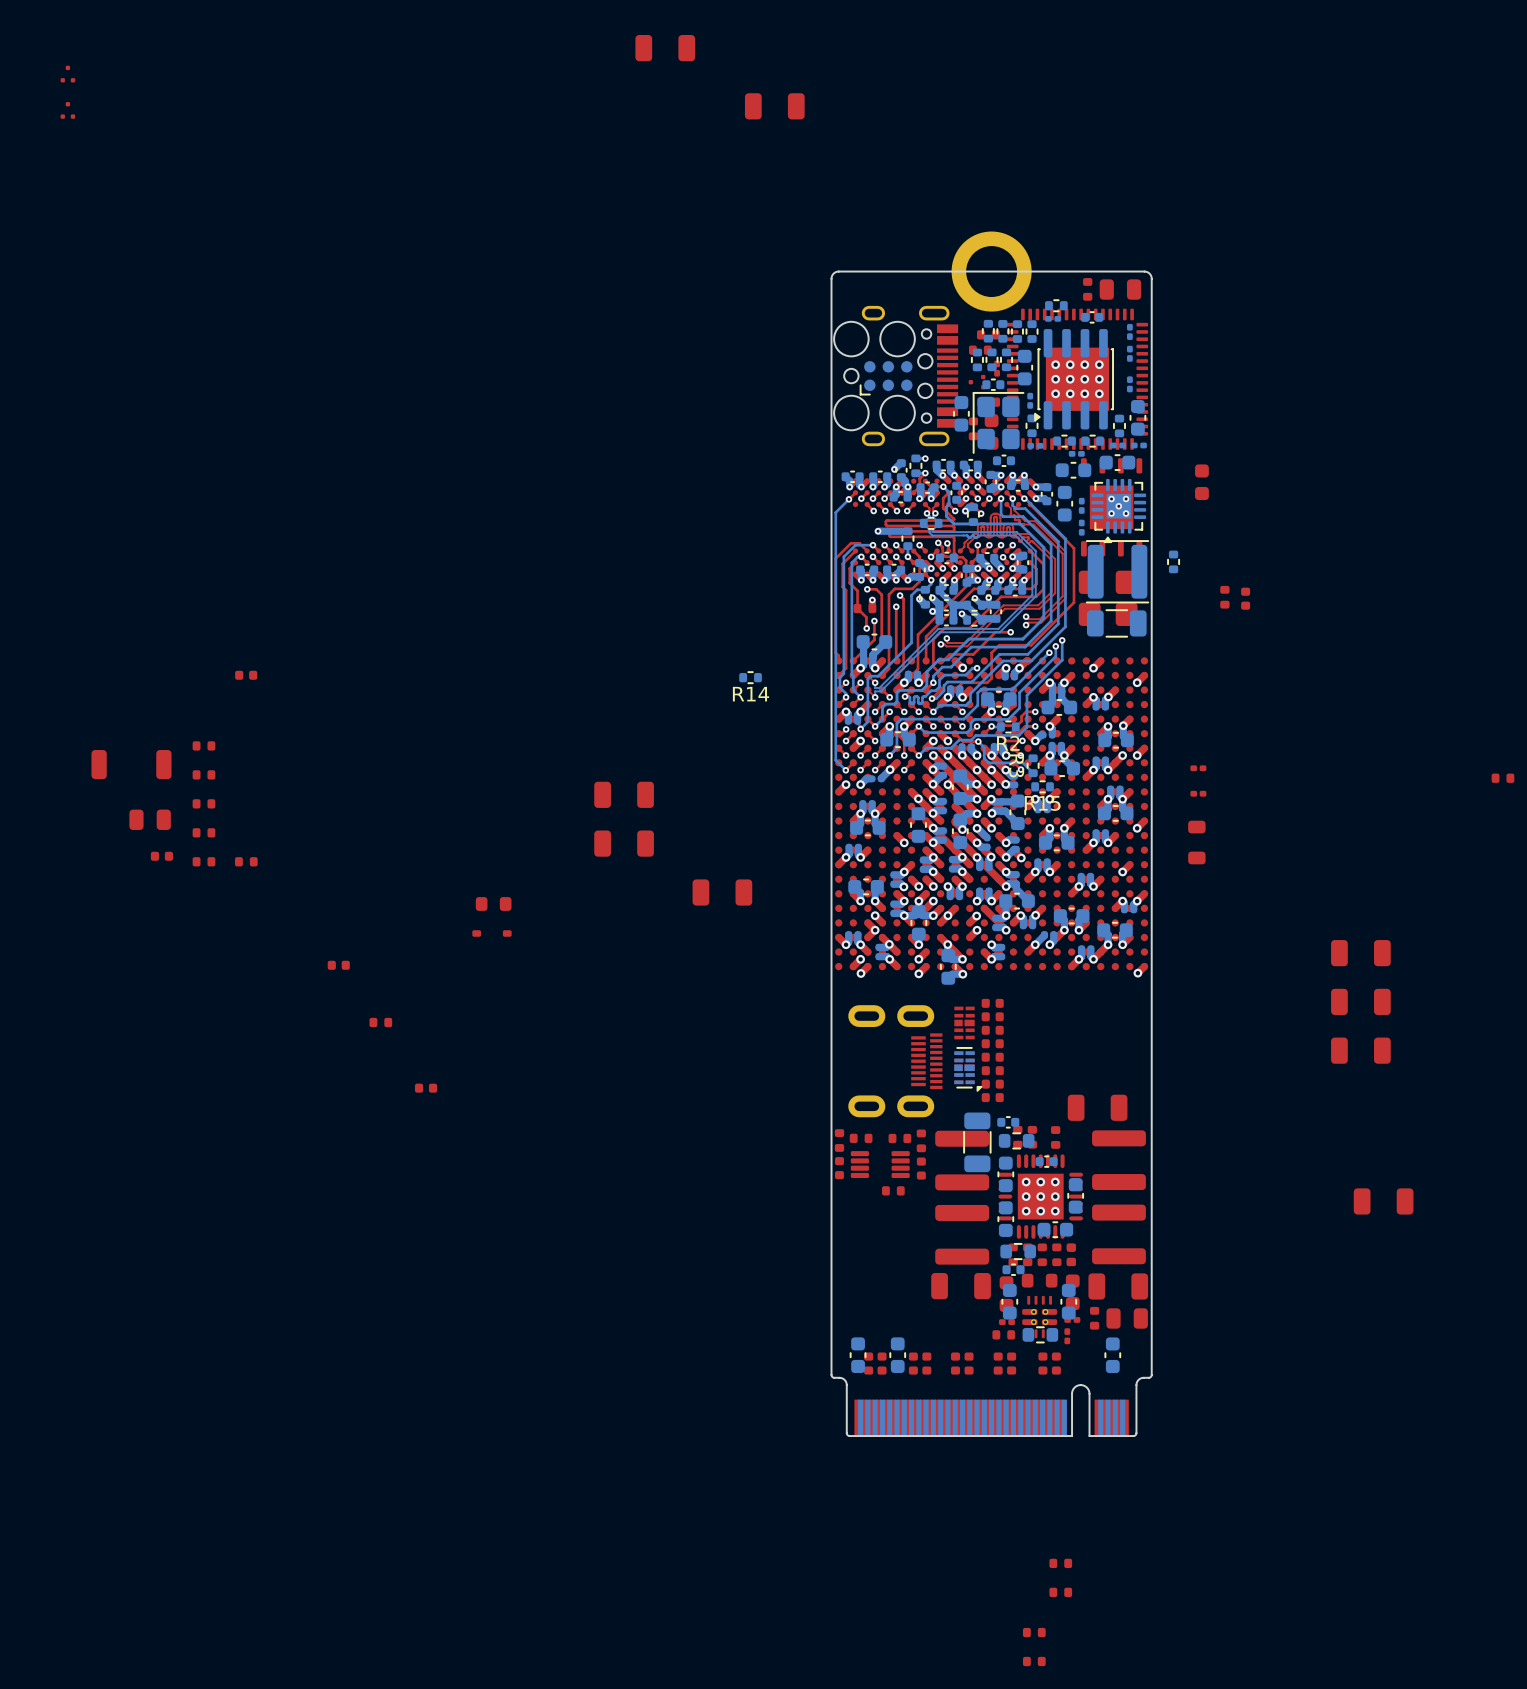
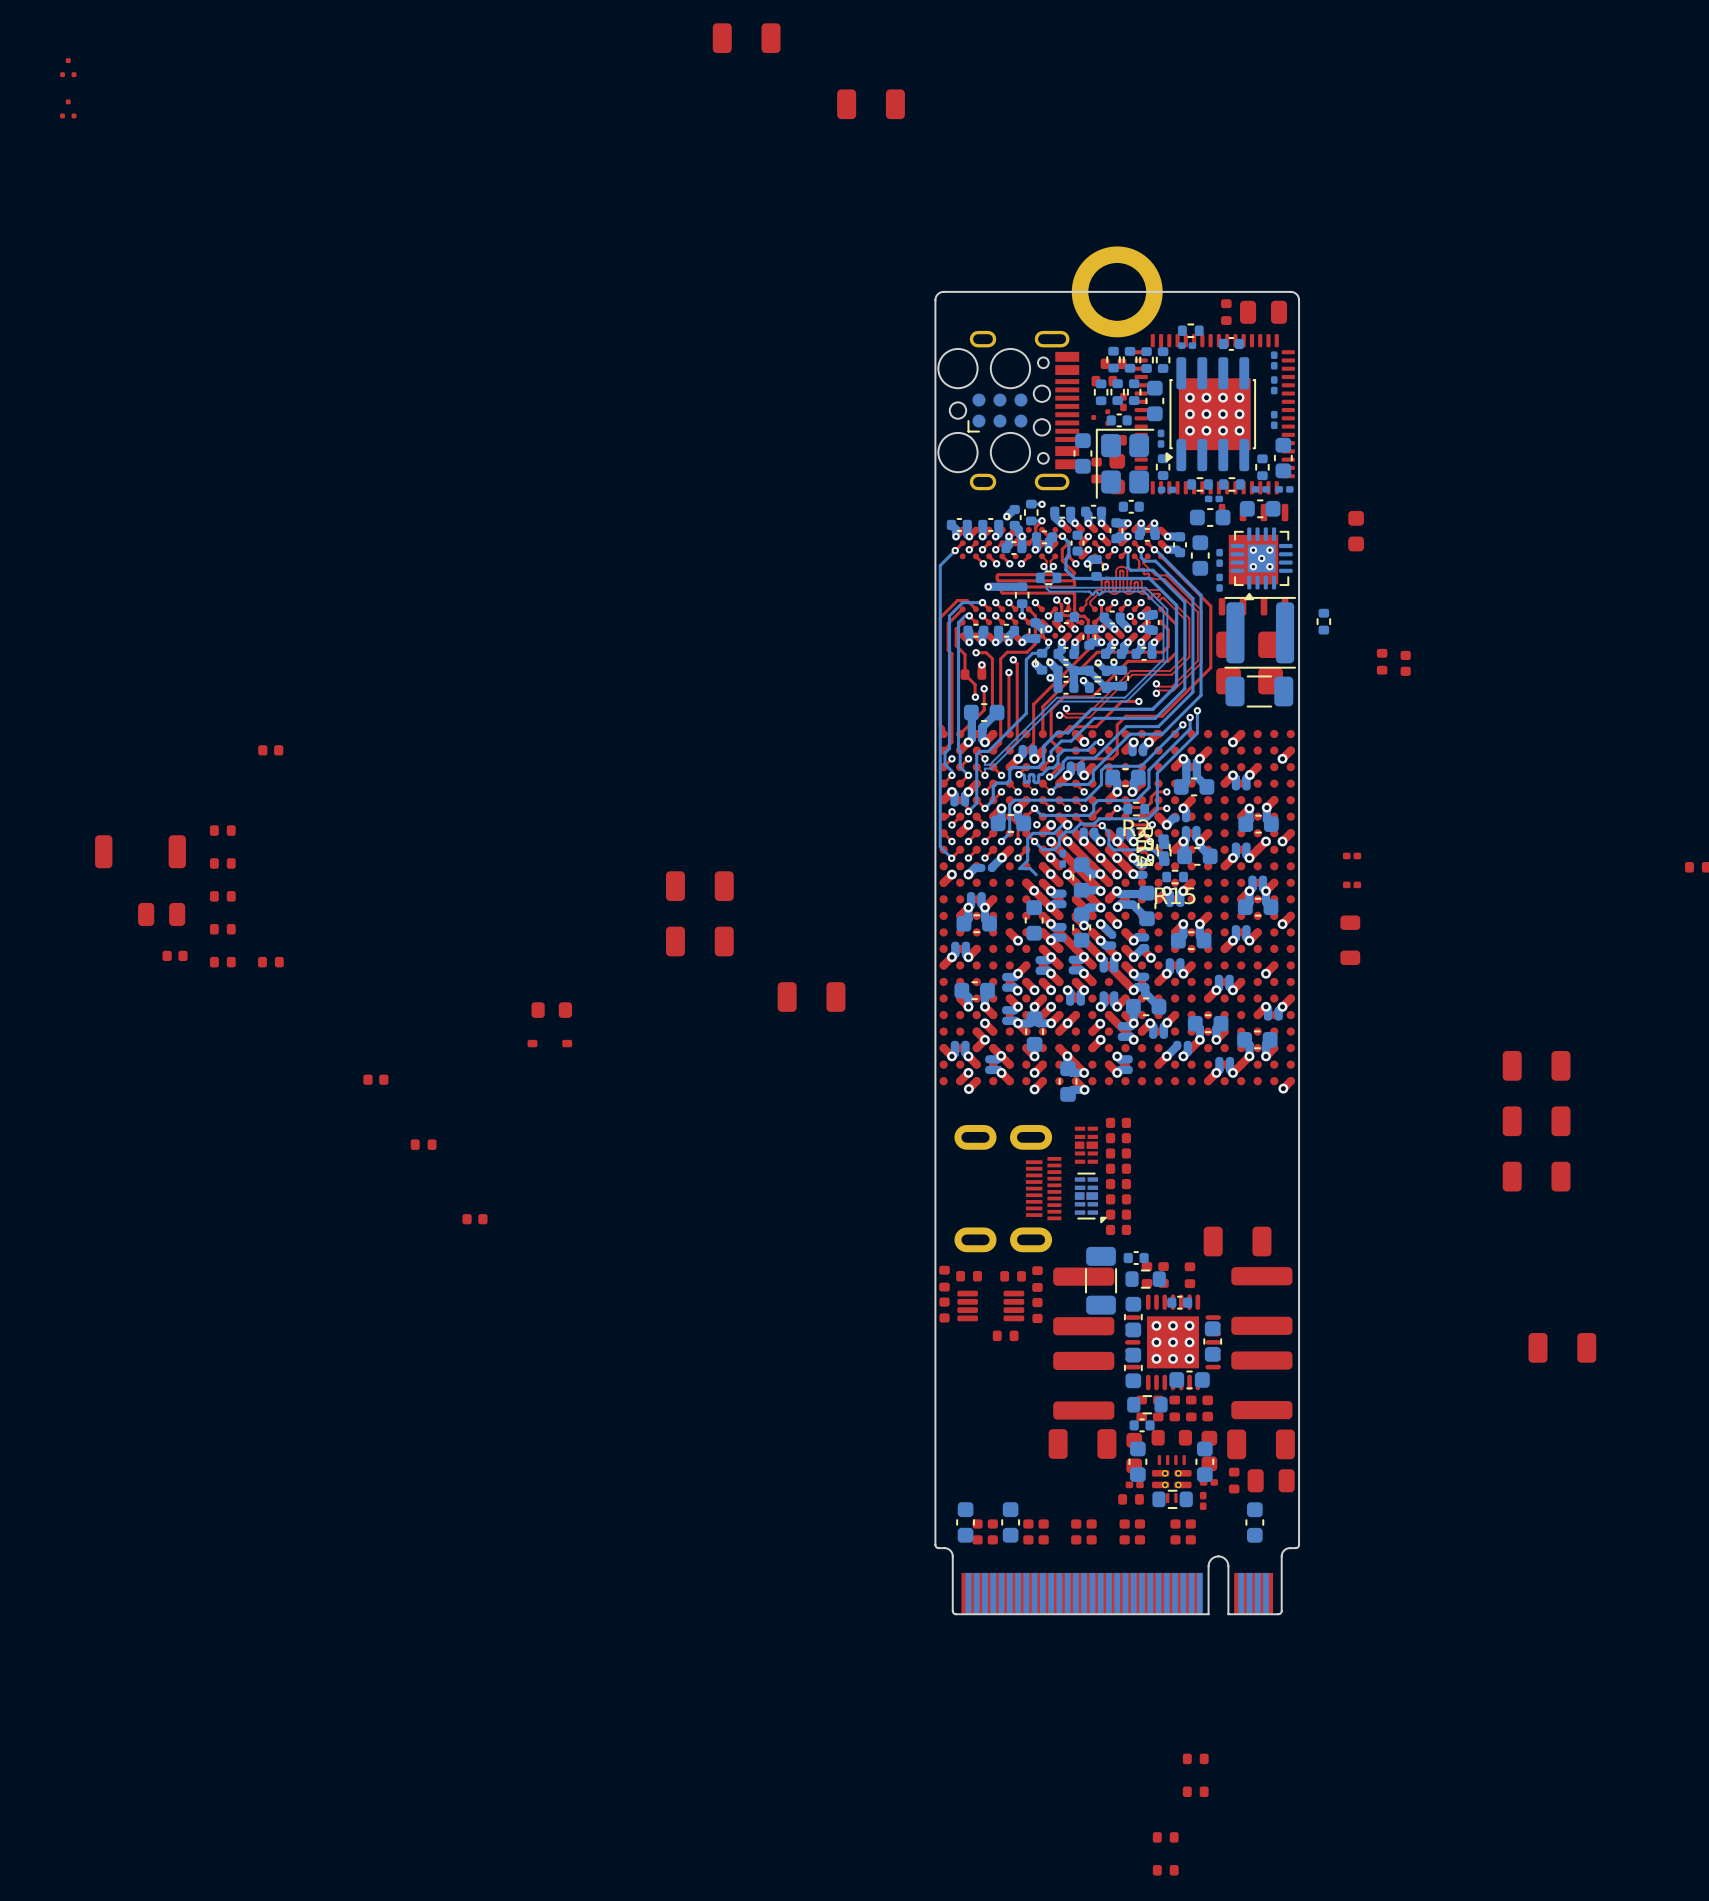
R14 rotation: 0° (750, 677) -> 90° clockwise (1163, 847)
R14 position: (750, 677) -> (1163, 847)
via position: (977, 726) -> (1036, 824)
bottom track: none -> (1067, 824) (1062, 824) (1054, 833) (1032, 833) (1027, 838) (1027, 860) (1019, 868) (1030, 868) (1036, 874)
bottom track: (952, 747) (926, 748) (918, 755) -> (1072, 831) (1065, 831) (1059, 838) (1059, 844) (1054, 849) (1042, 849) (1034, 841)
bottom track: (943, 766) (936, 766) (933, 769) -> none
bottom track: (943, 775) (933, 784) -> none

